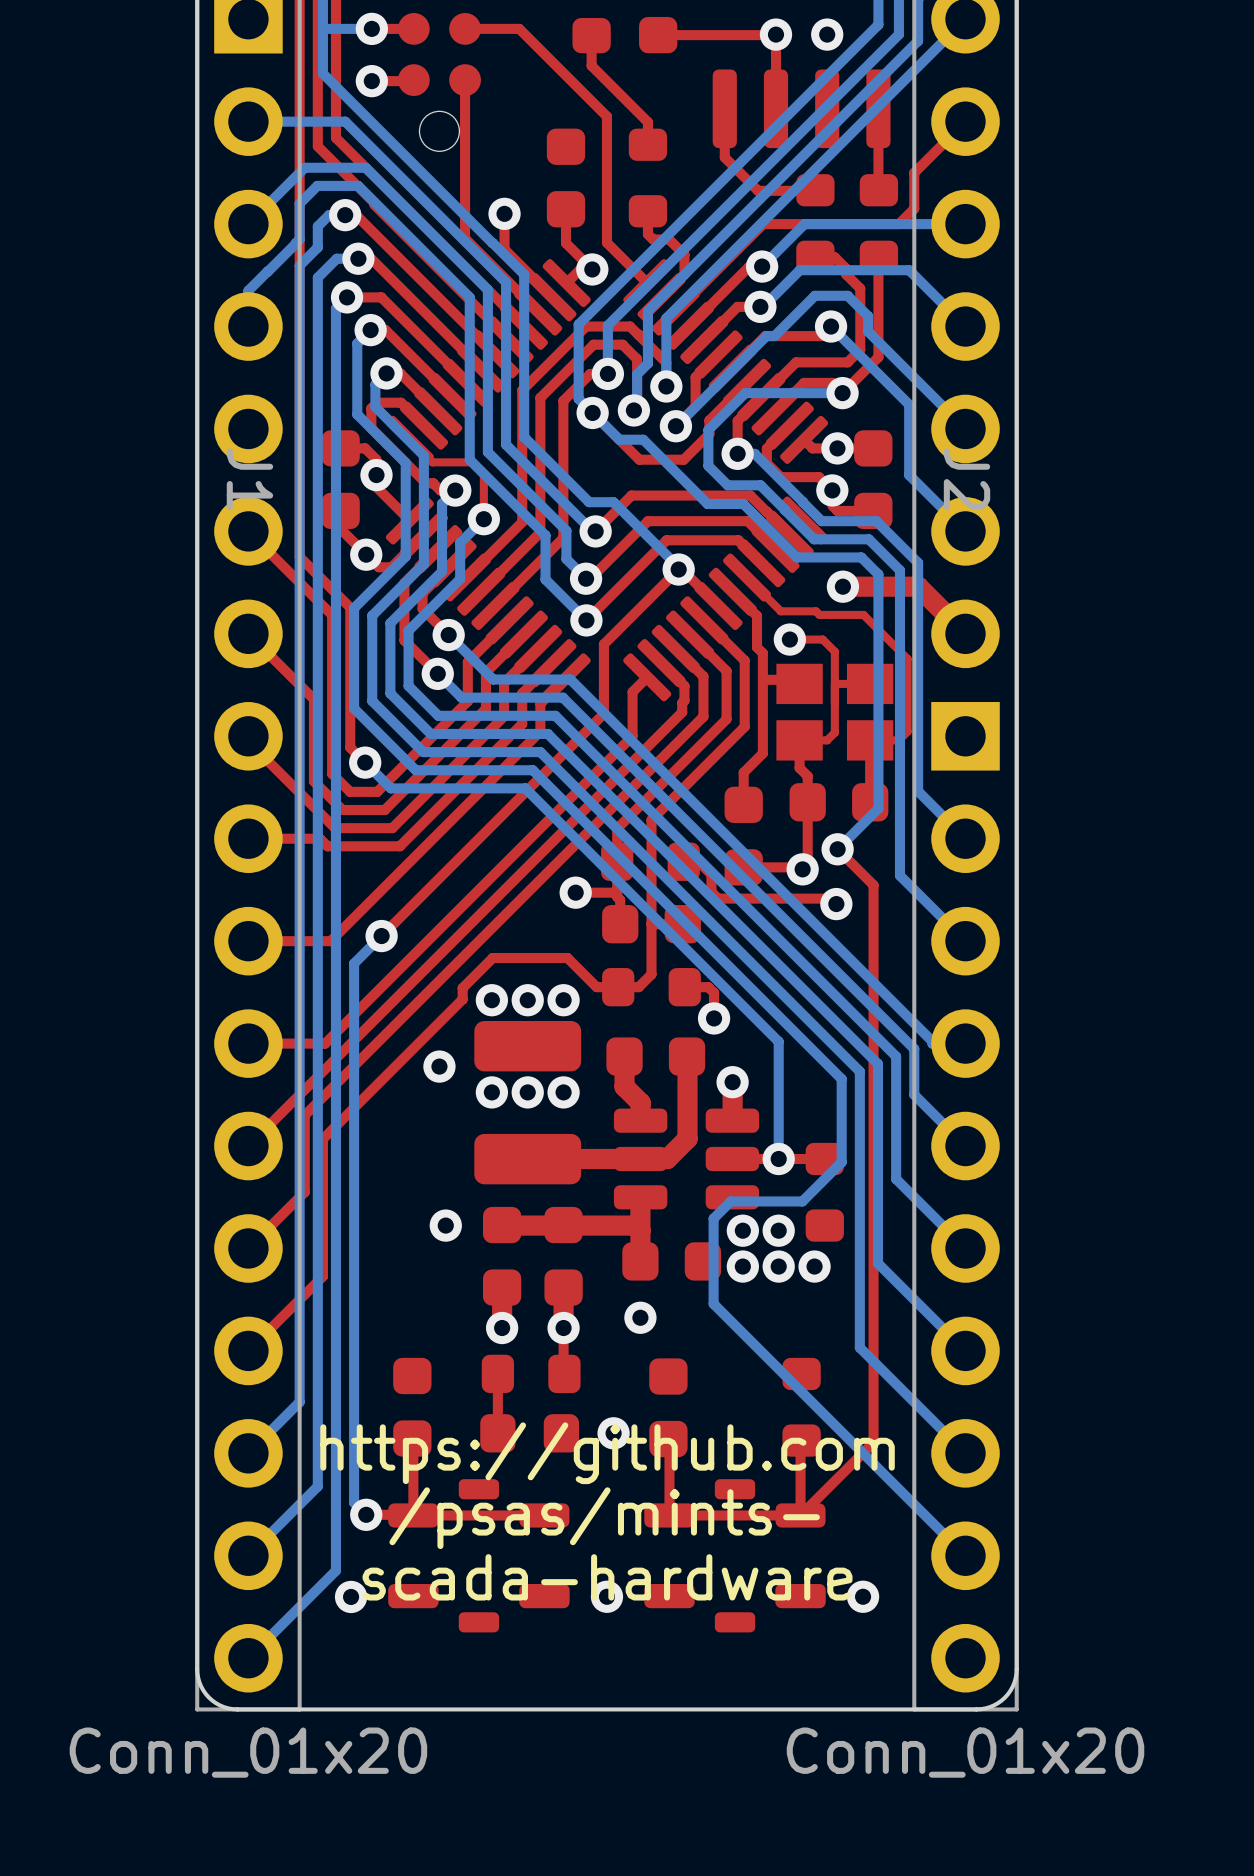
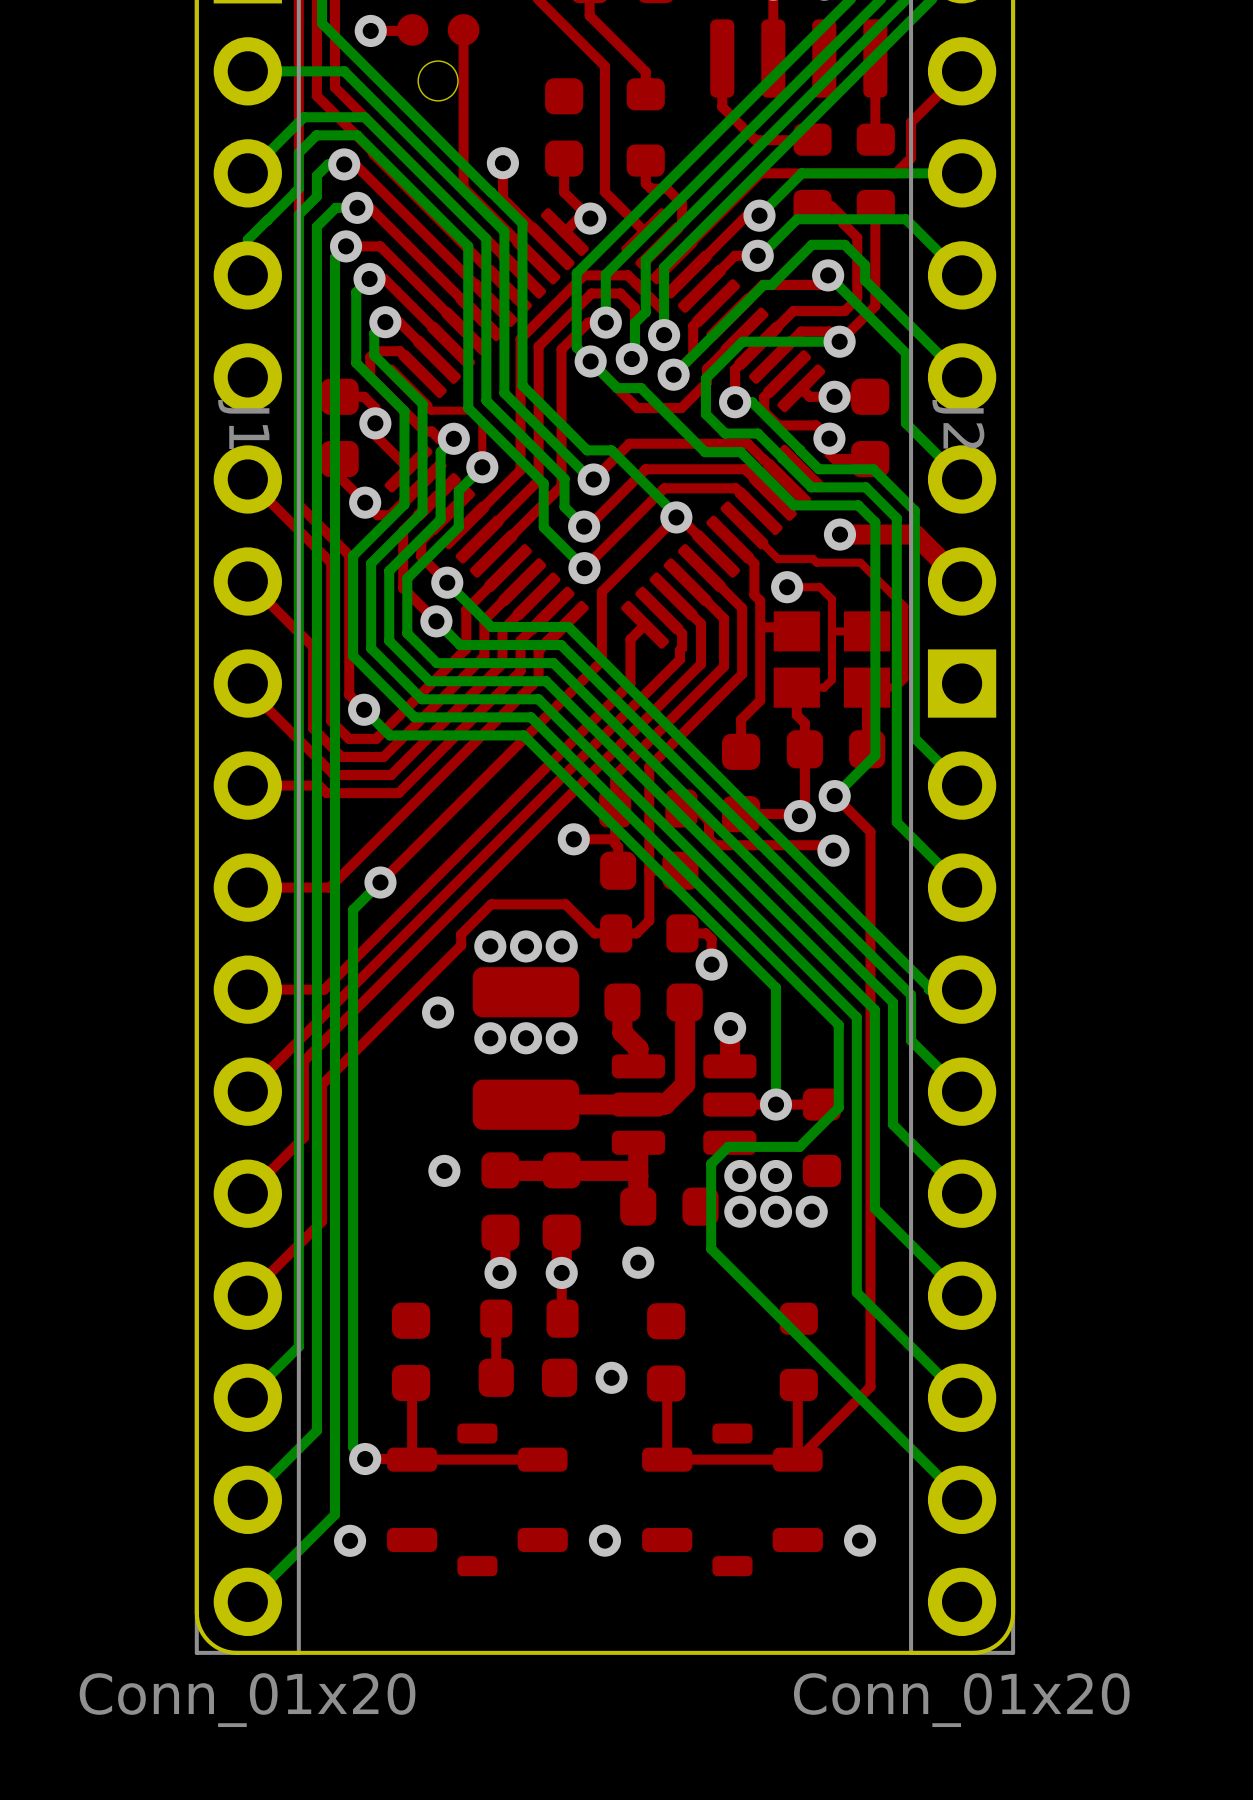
text: https://github.com (607, 1453) -> none
text: /psas/mints- (604, 1518) -> none
text: scada-hardware (607, 1577) -> none

